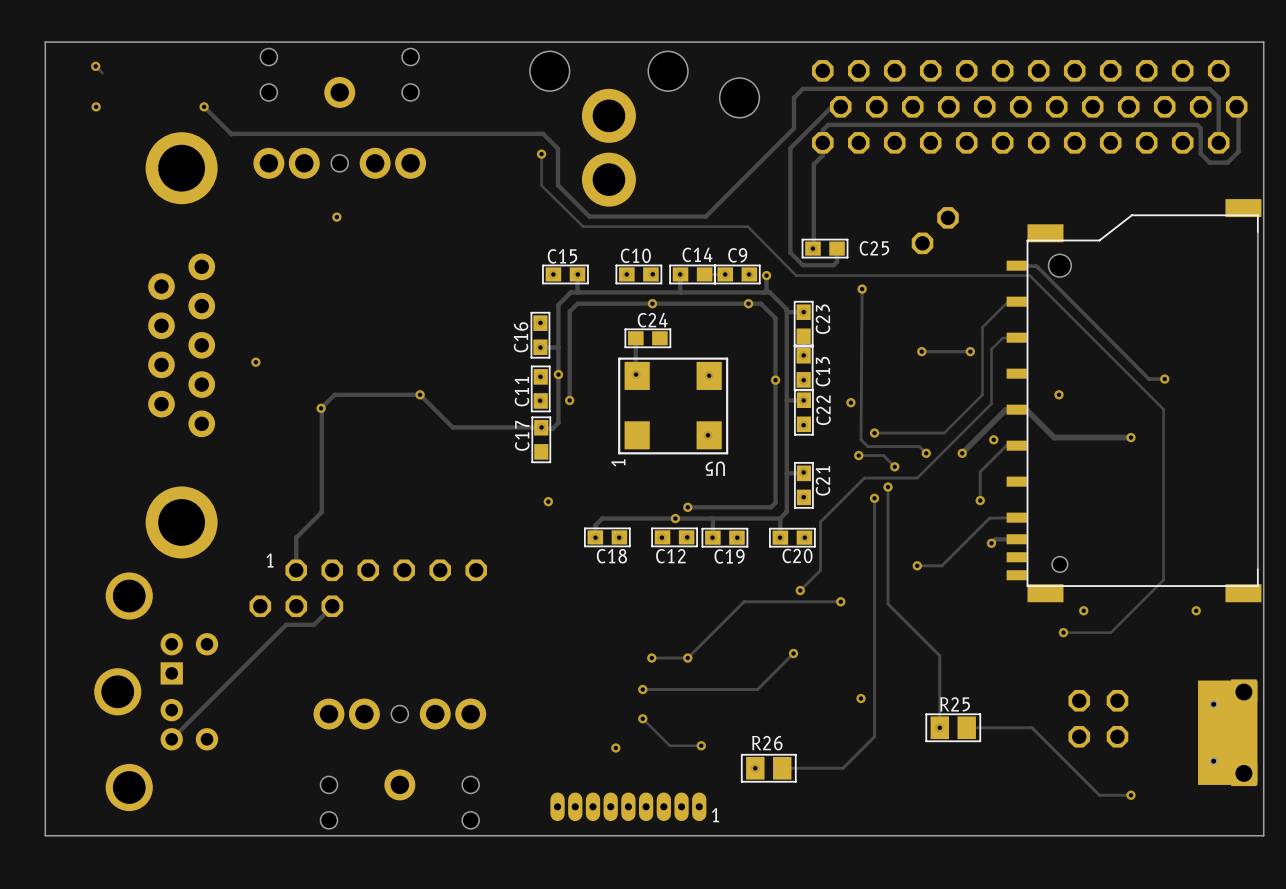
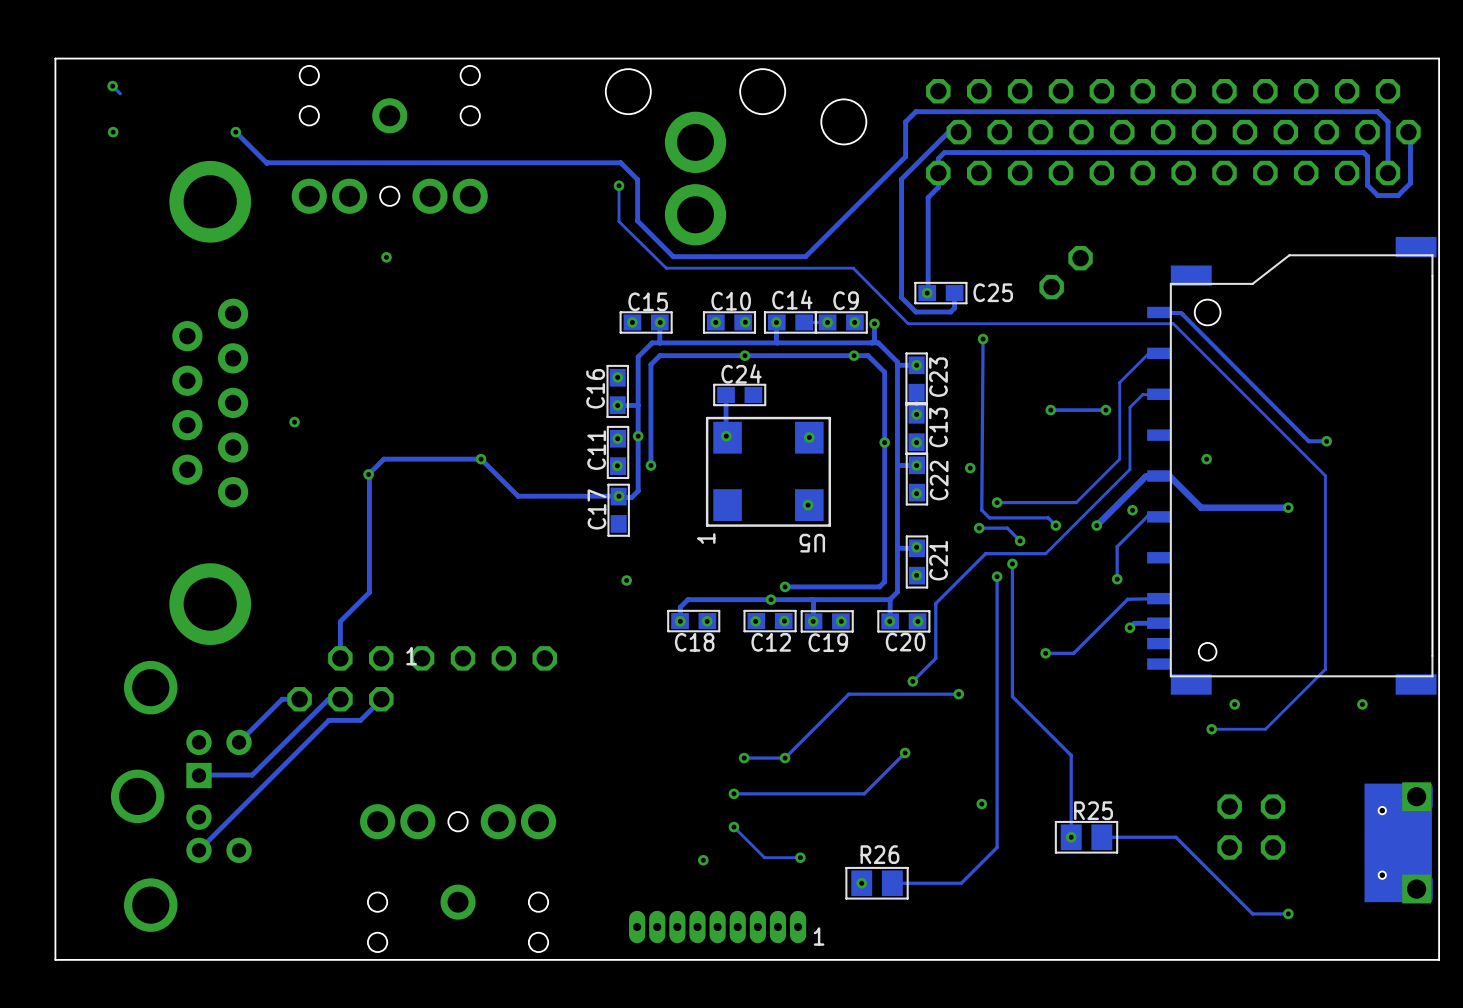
text position: 1 (270, 560) -> 1 (411, 656)
track: none -> (299, 699) (282, 699) (239, 742)
track: none -> (340, 699) (328, 699) (252, 775) (198, 775)

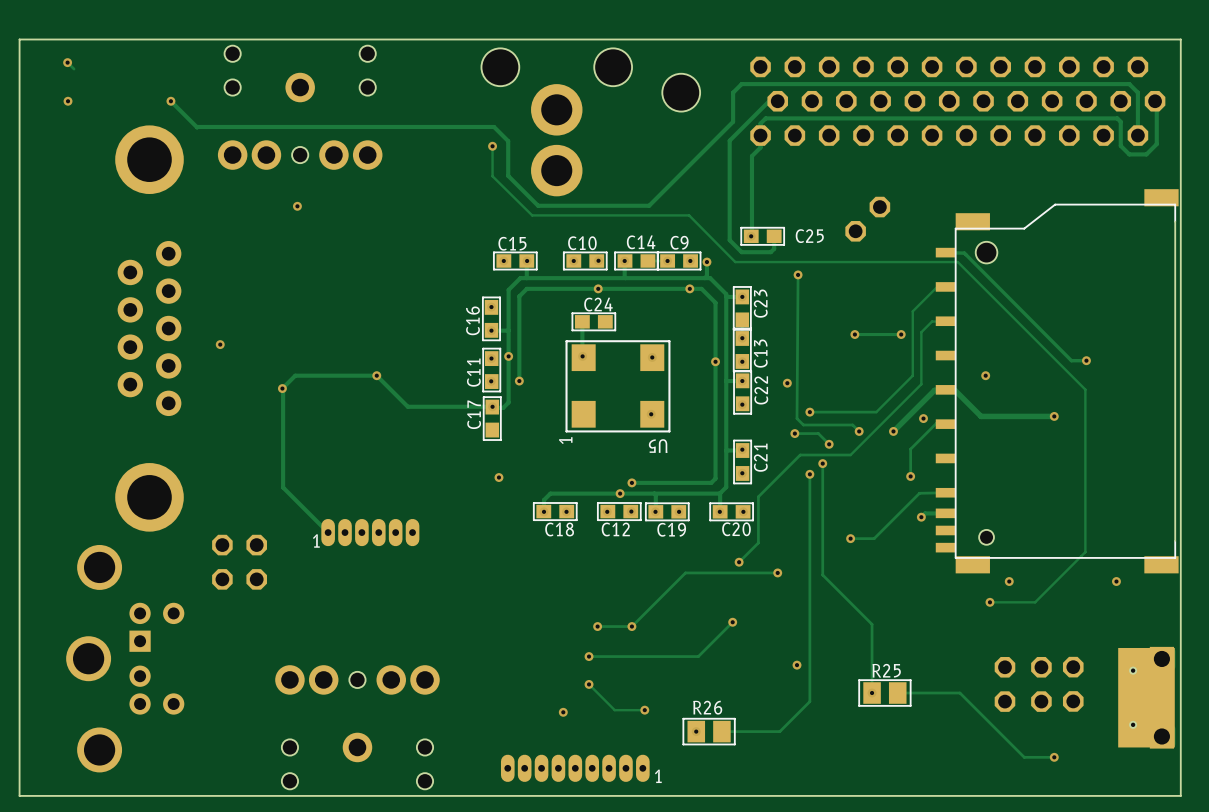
track: (369, 592) (340, 621) (340, 658) -> (283, 487) (328, 532)
part: none -> (370, 532)
part: (442, 658) -> none
part: none -> (239, 562)
track: (299, 699) (282, 699) (239, 742) -> none
track: (340, 699) (328, 699) (252, 775) (198, 775) -> none
part: (340, 699) -> none
track: (381, 699) (360, 720) (328, 720) (198, 850) -> none
part: none -> (1073, 684)

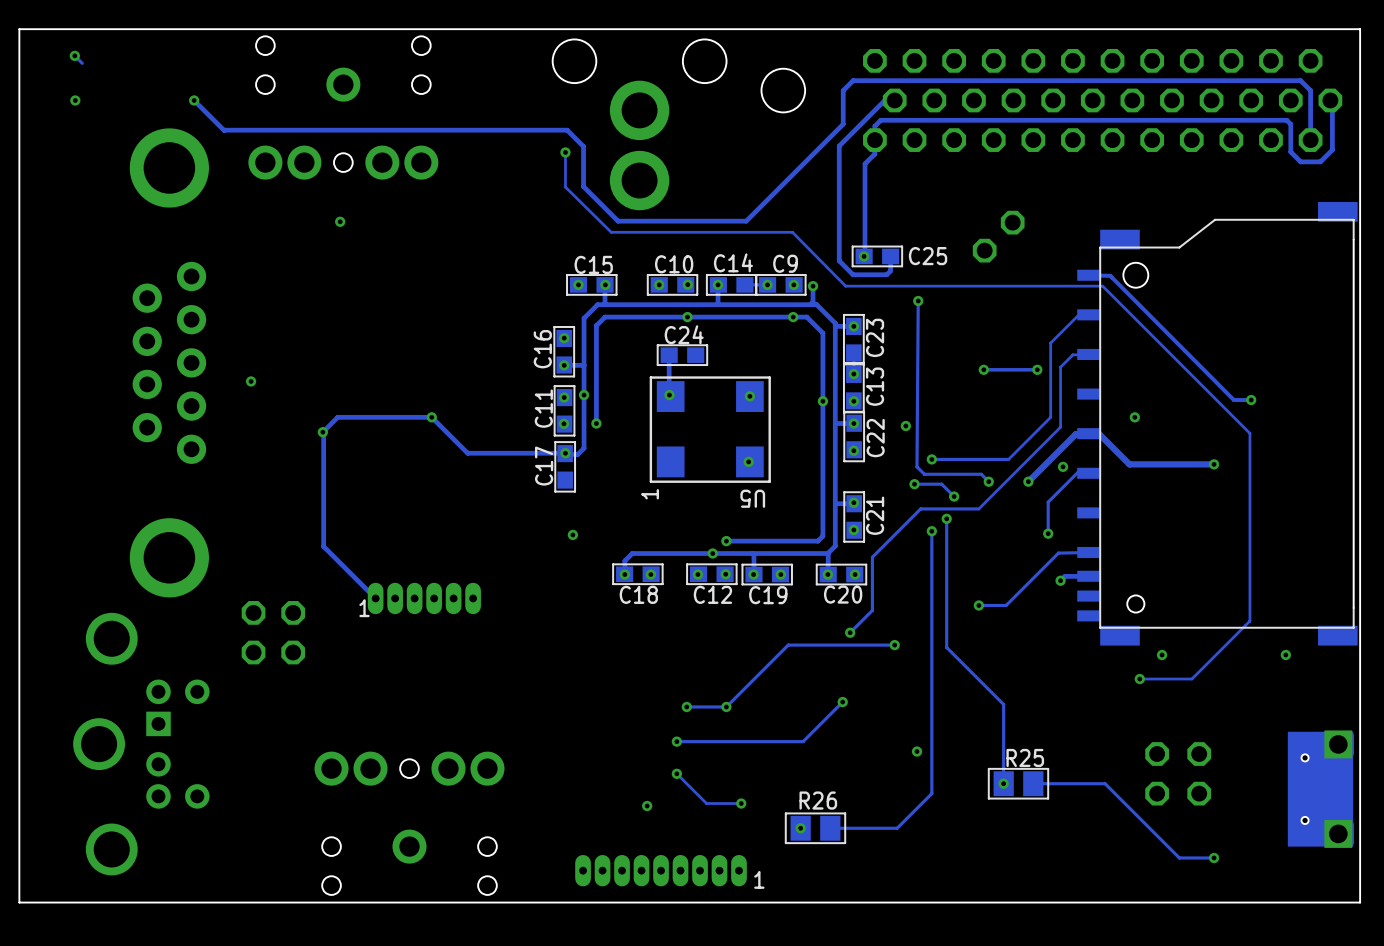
part: (1073, 684) -> none

